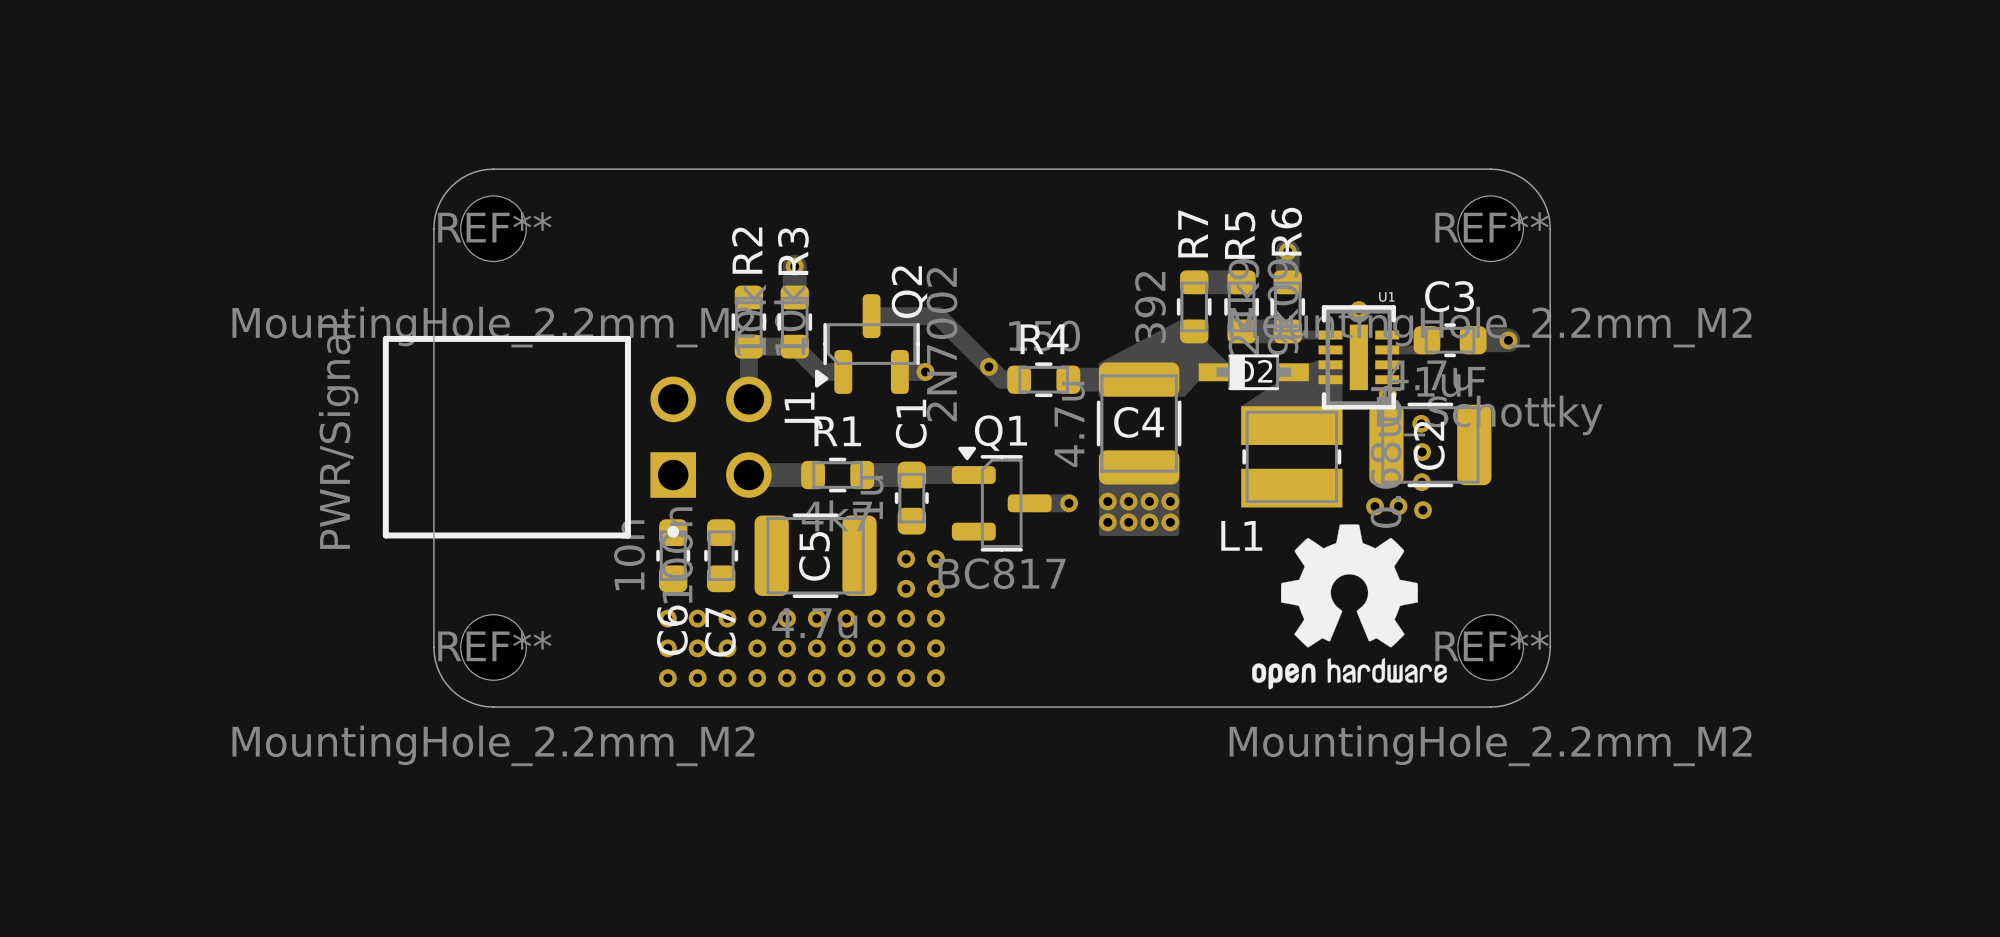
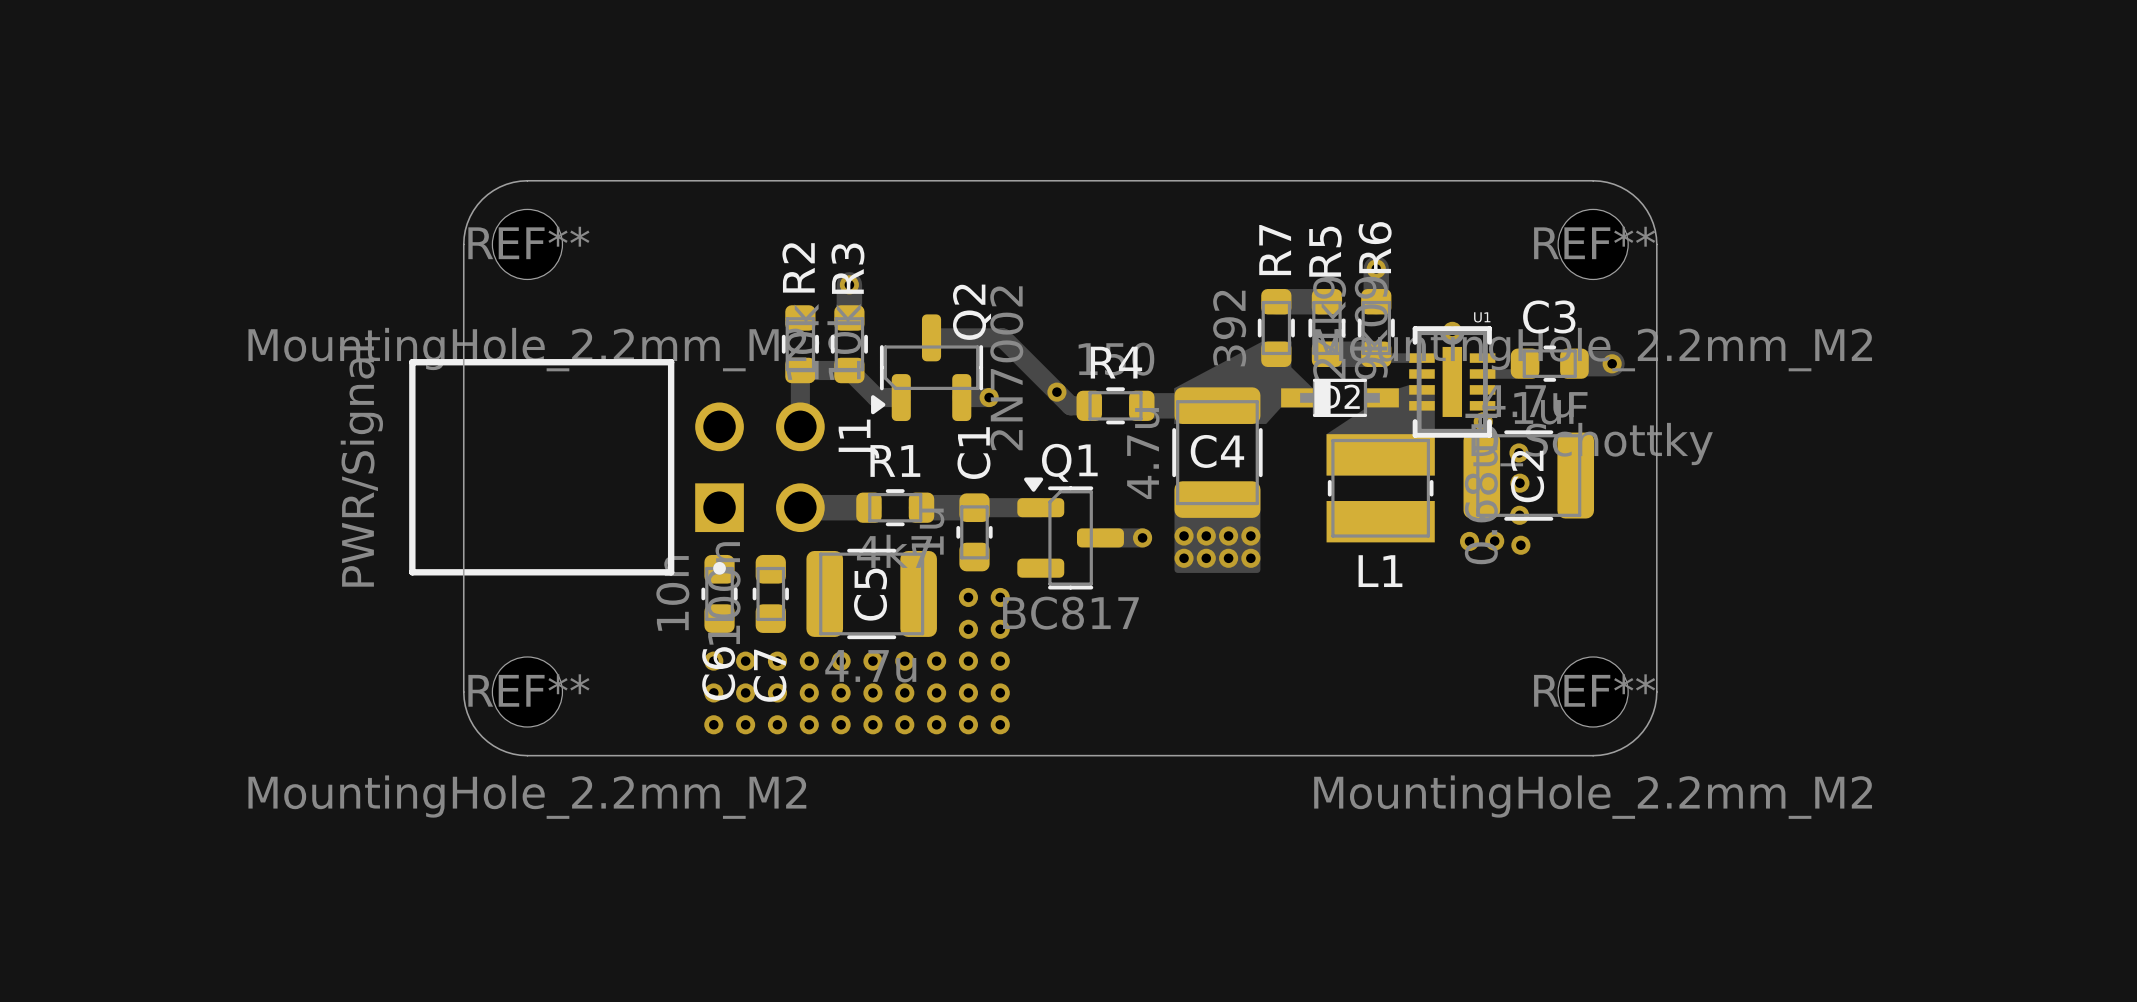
drawing: [1252, 524, 1447, 690] -> none
L1 name position: L1 (1241, 535) -> L1 (1380, 571)

